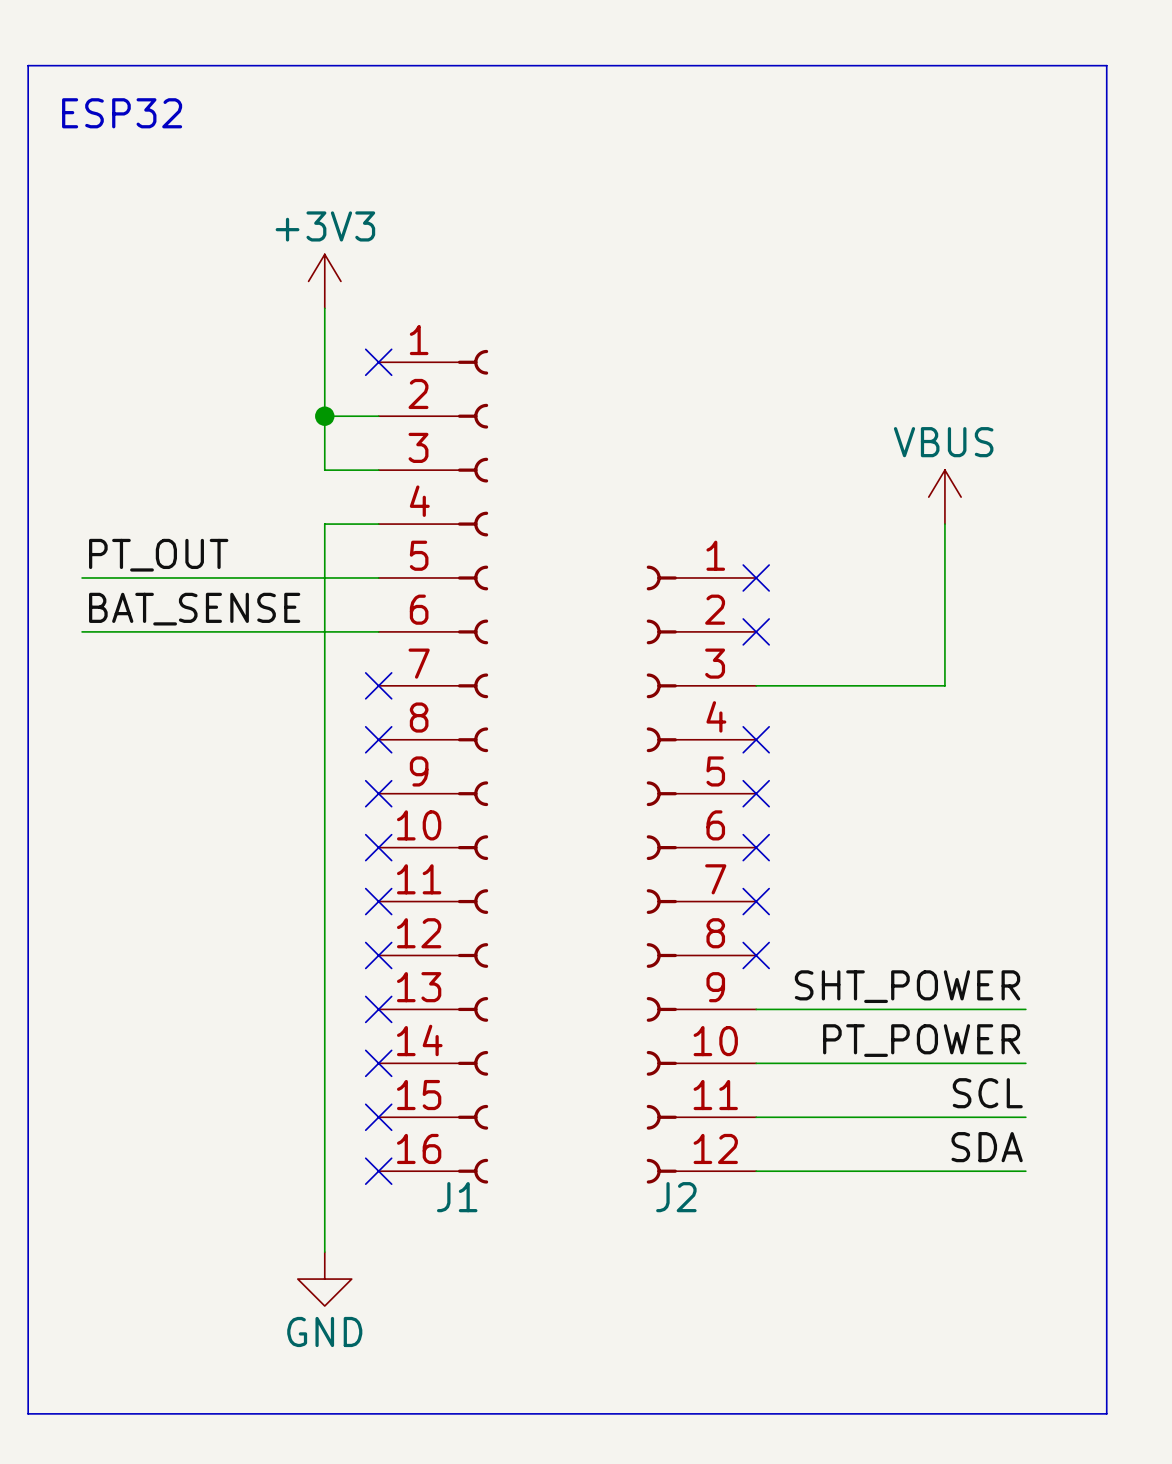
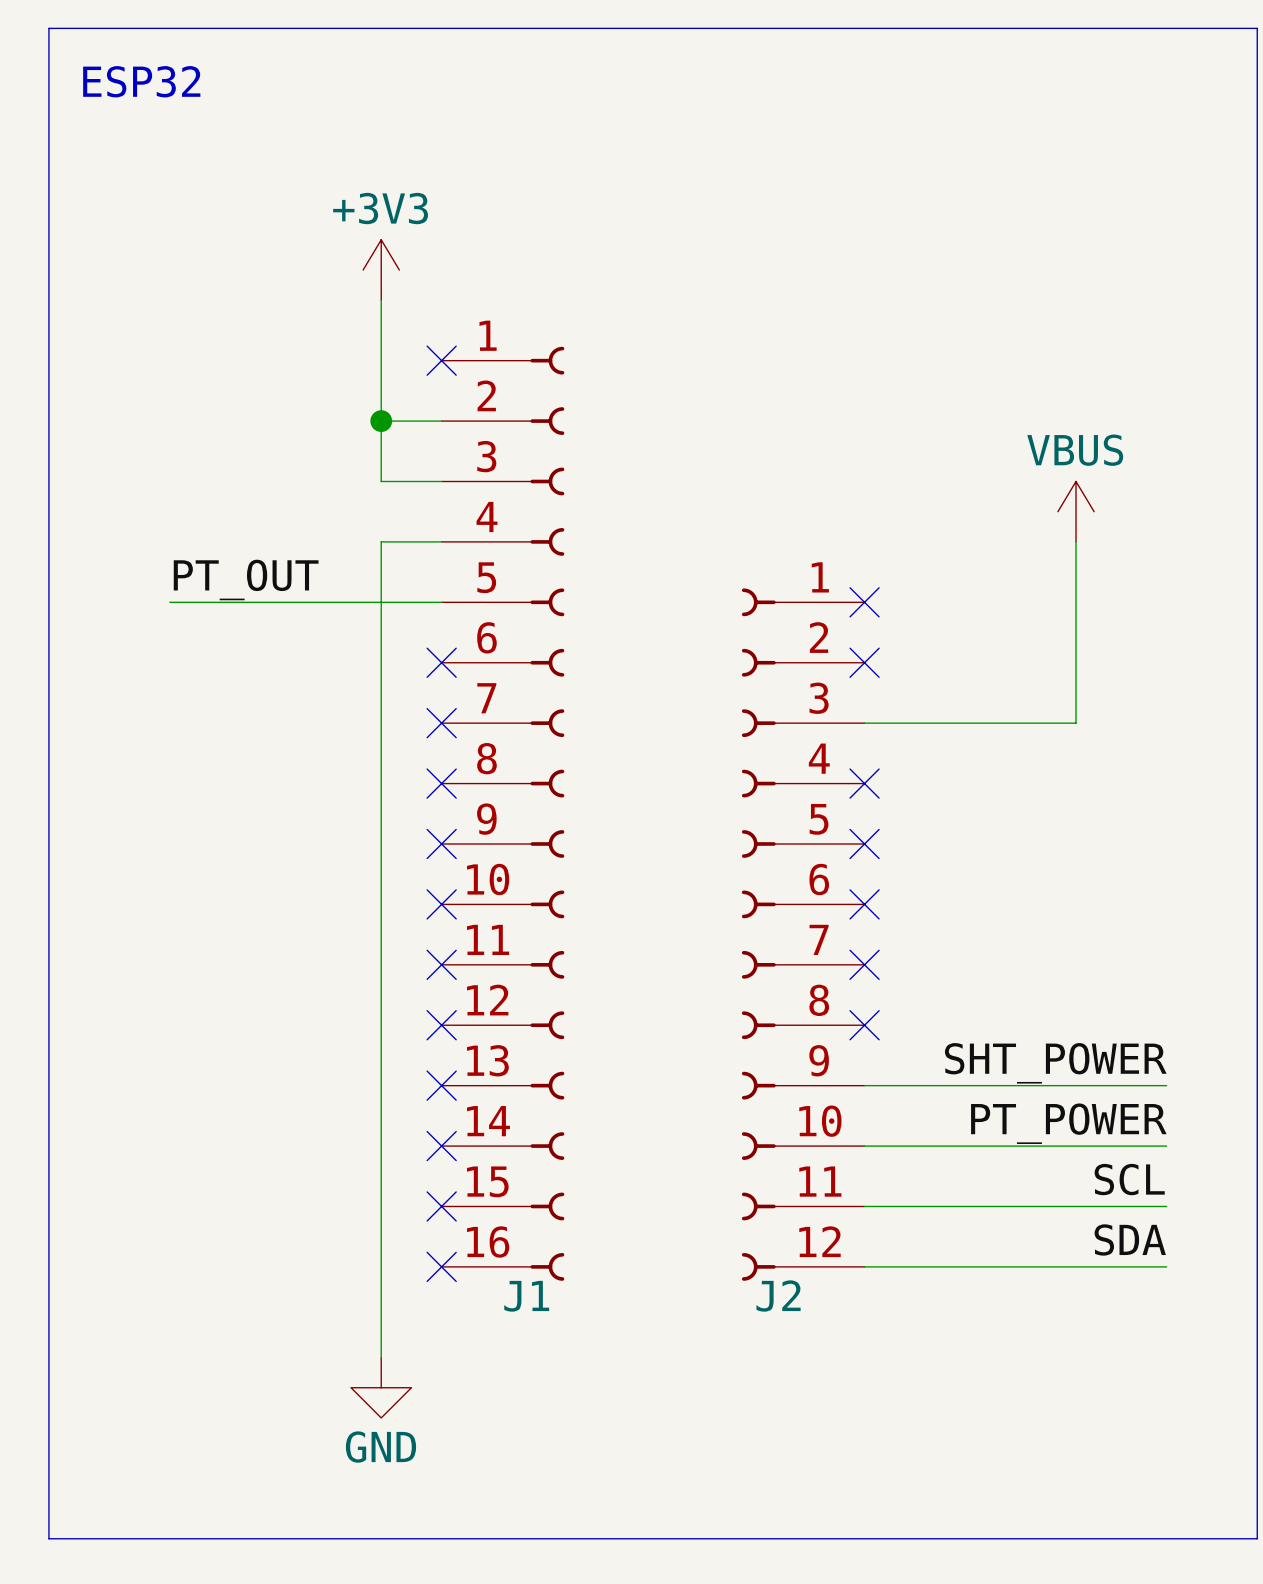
label position: PT_OUT (158, 555) -> PT_OUT (246, 579)
wire: (82, 577) (136, 577) -> none
label: BAT_SENSE (194, 609) -> none
wire: (82, 631) (378, 631) -> none
no-connect mark: none -> (441, 662)

